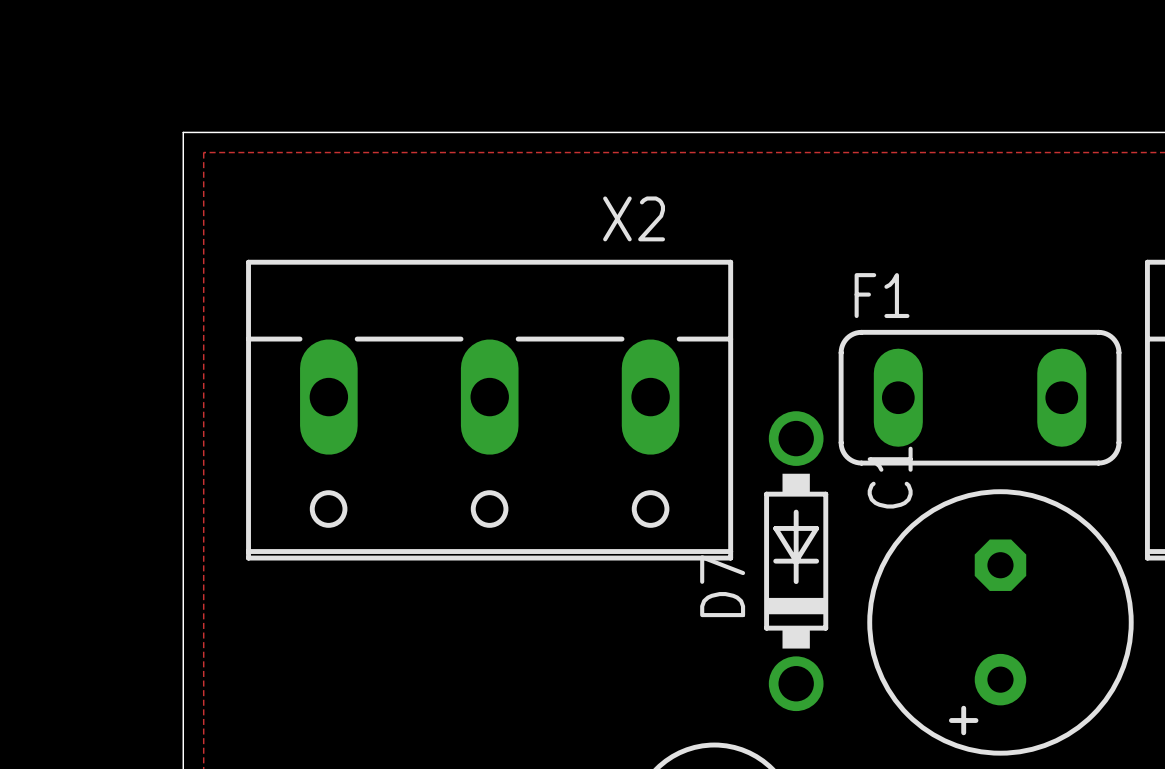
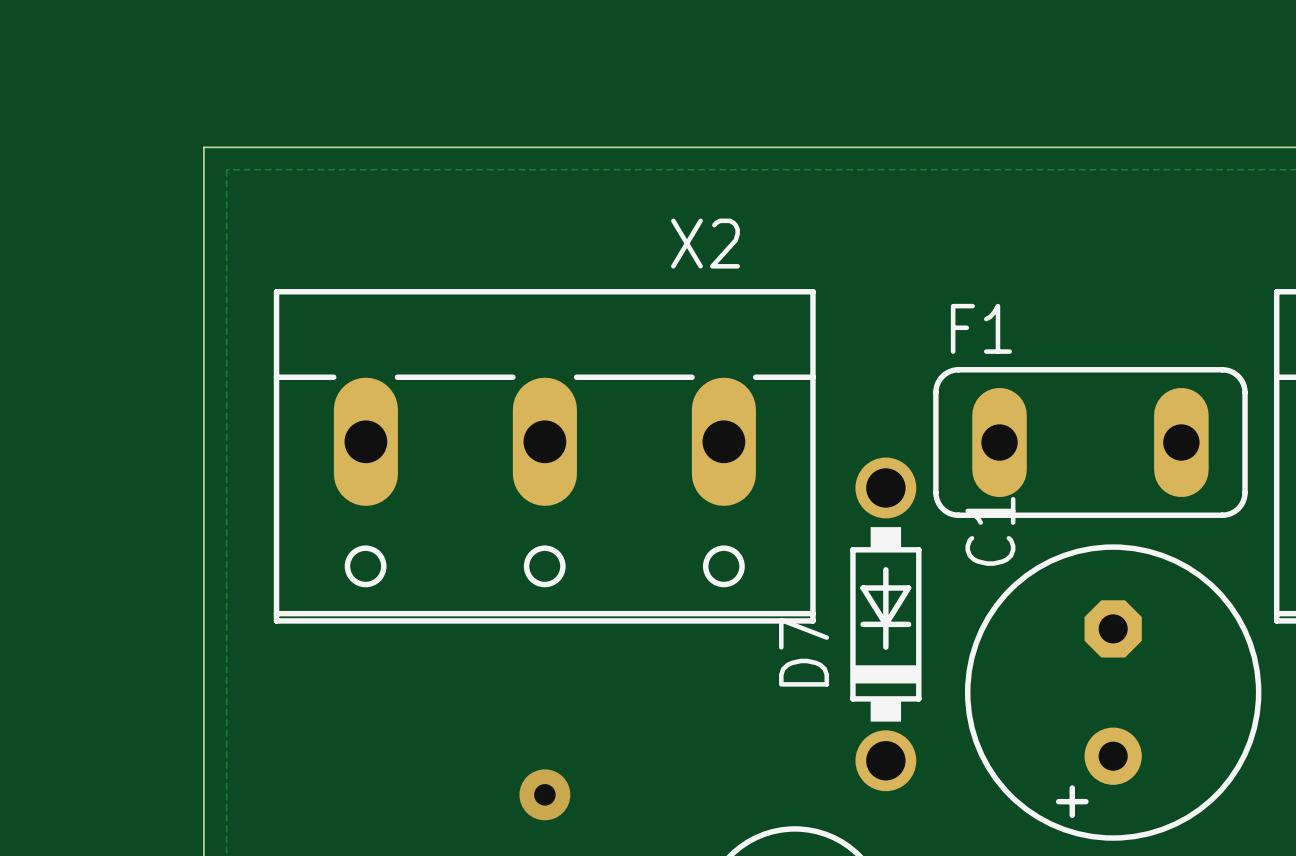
via: none -> (544, 794)

